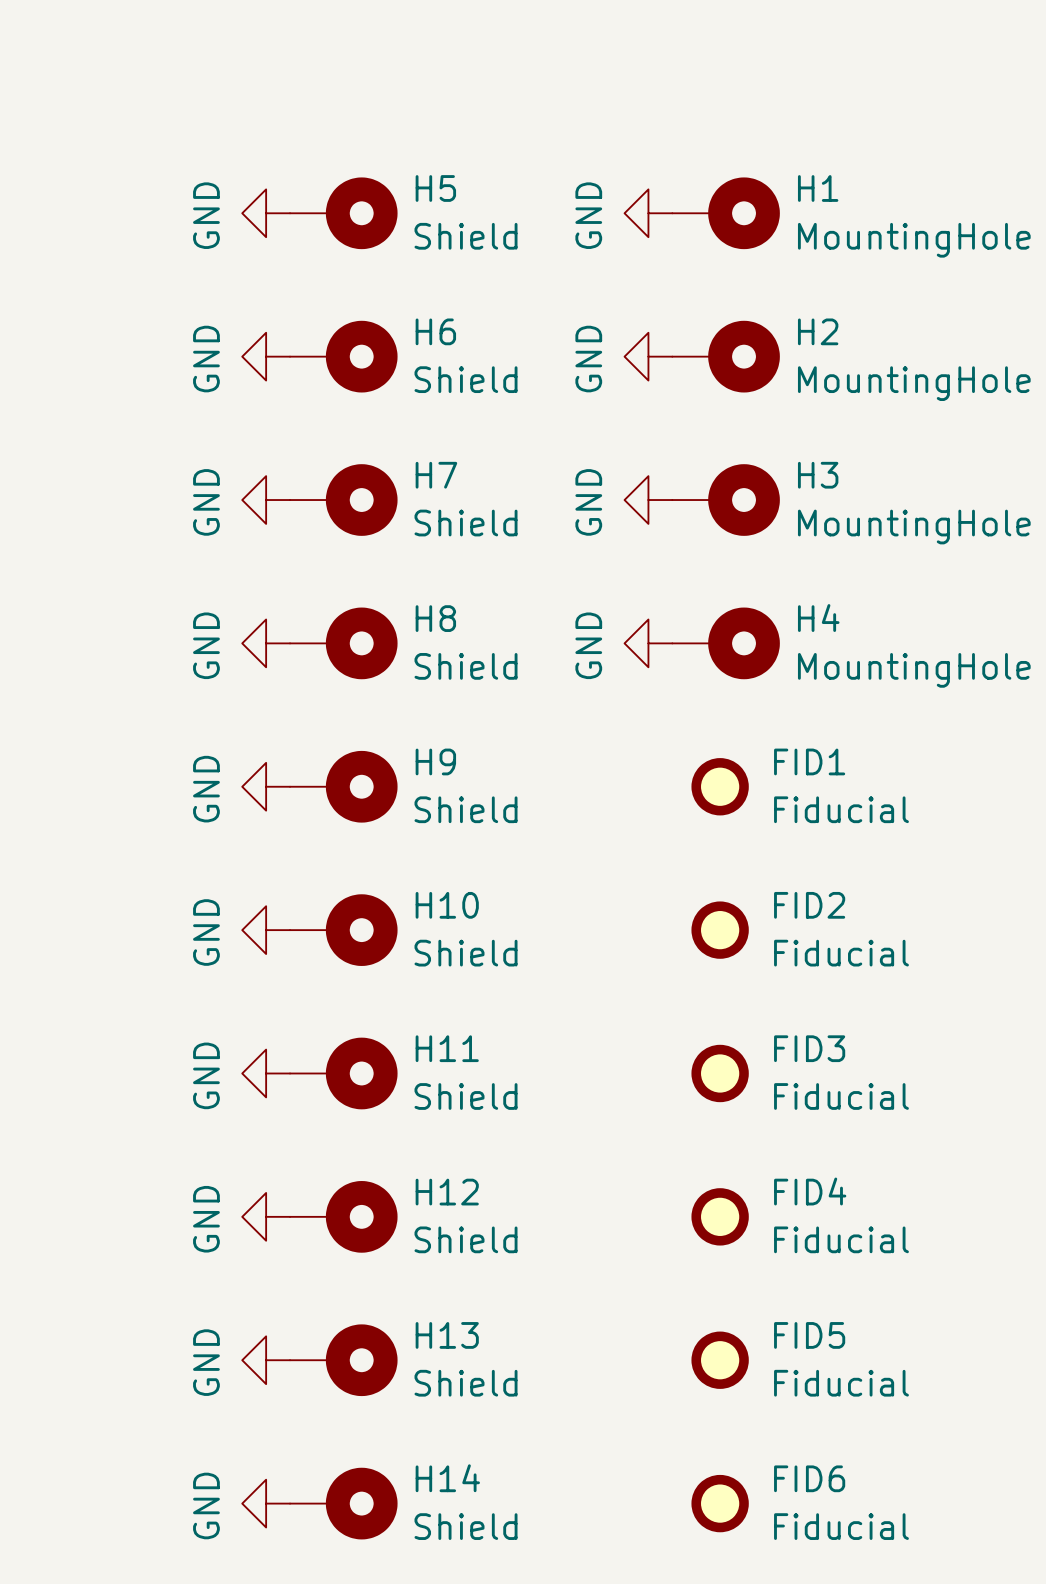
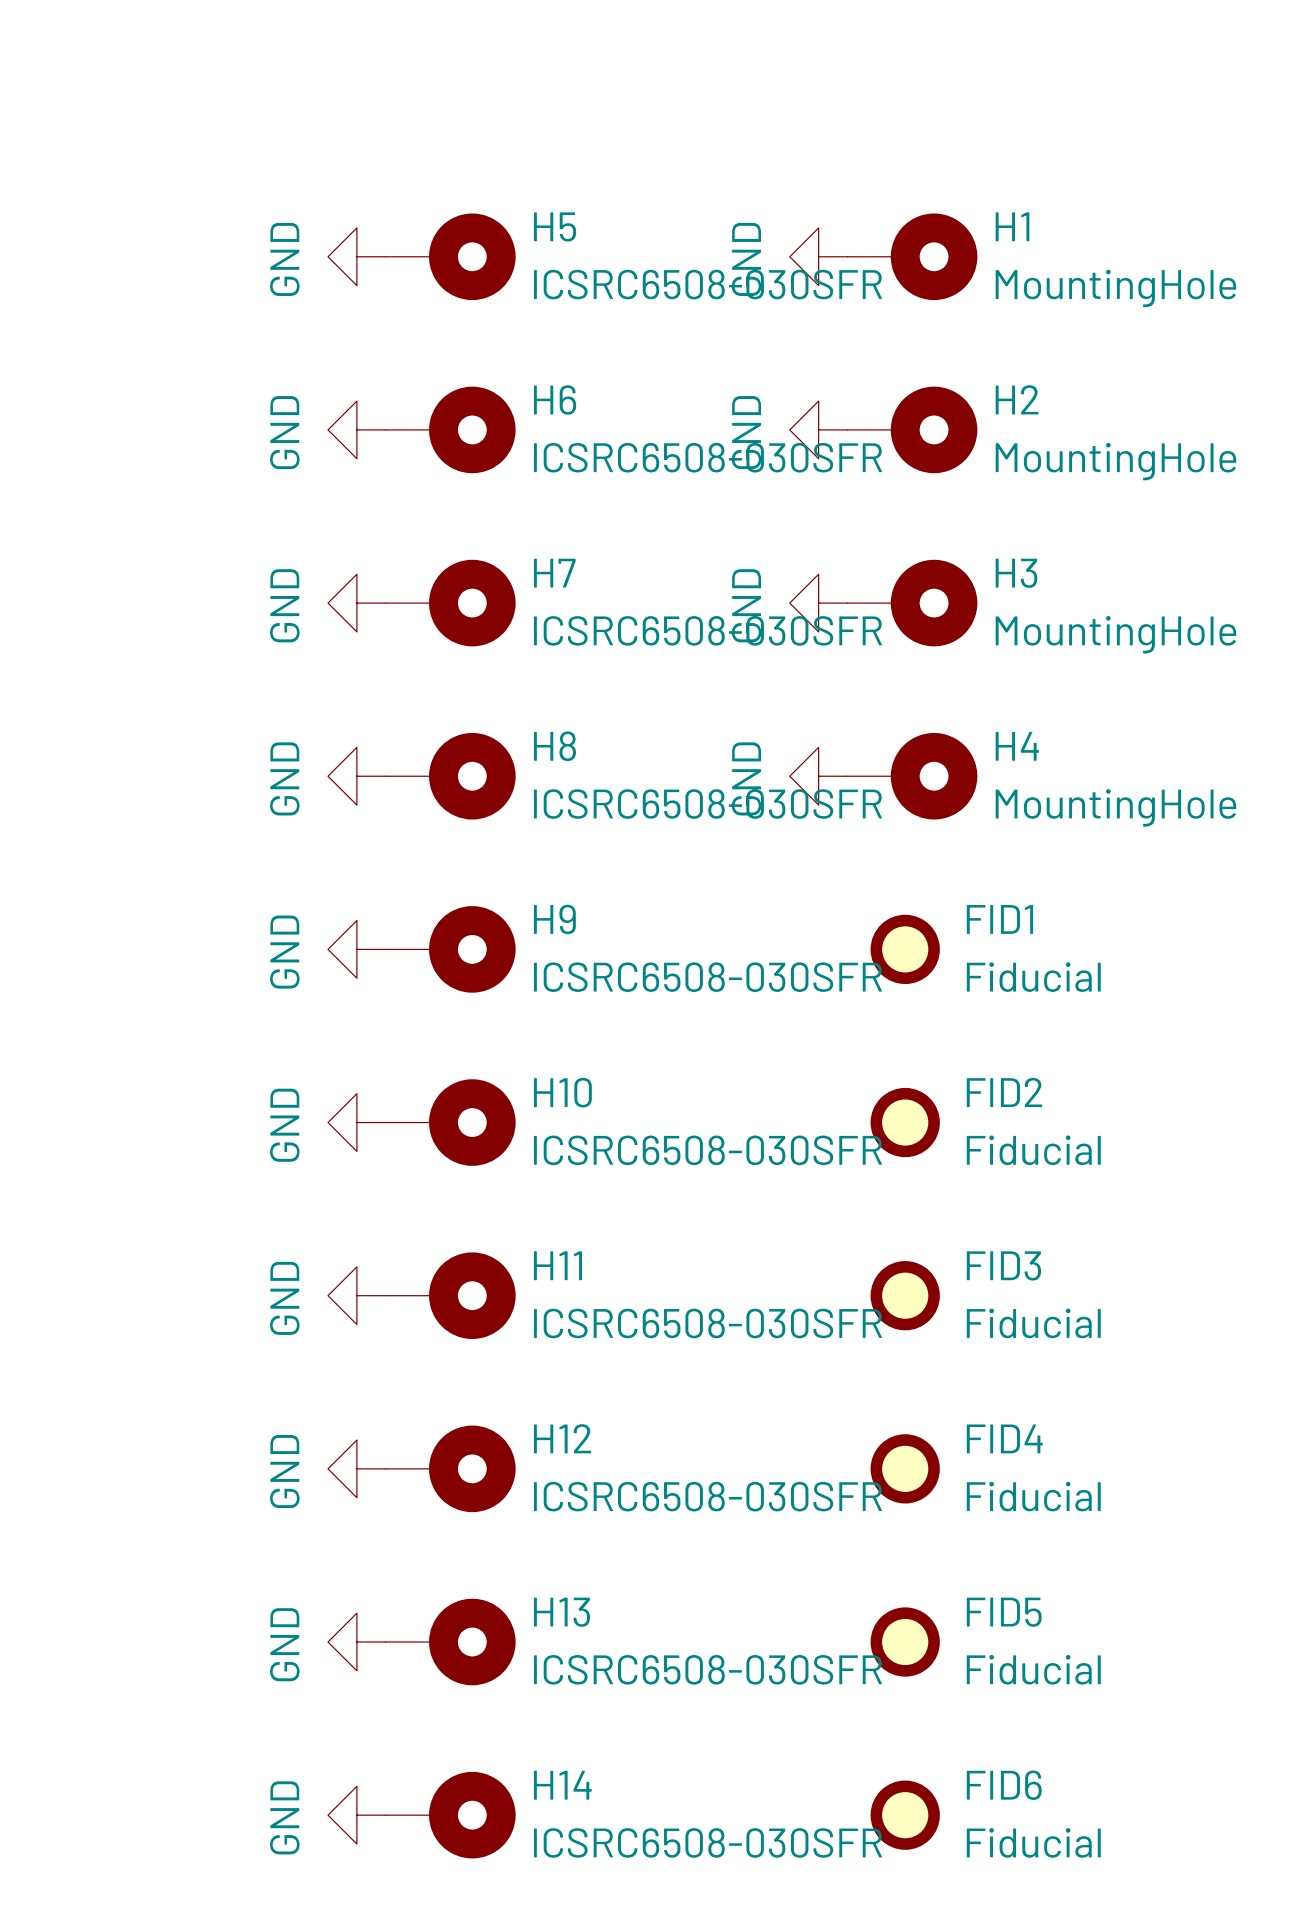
H5 value: Shield (466, 236) -> ICSRC6508-030SFR (707, 284)
H6 value: Shield (466, 379) -> ICSRC6508-030SFR (707, 457)
H7 value: Shield (466, 523) -> ICSRC6508-030SFR (707, 630)
H8 value: Shield (466, 666) -> ICSRC6508-030SFR (707, 804)
H9 value: Shield (466, 809) -> ICSRC6508-030SFR (707, 977)
H10 value: Shield (466, 953) -> ICSRC6508-030SFR (707, 1150)
H11 value: Shield (466, 1096) -> ICSRC6508-030SFR (707, 1323)
H12 value: Shield (466, 1239) -> ICSRC6508-030SFR (707, 1496)
H13 value: Shield (466, 1383) -> ICSRC6508-030SFR (707, 1669)
H14 value: Shield (466, 1526) -> ICSRC6508-030SFR (707, 1842)

